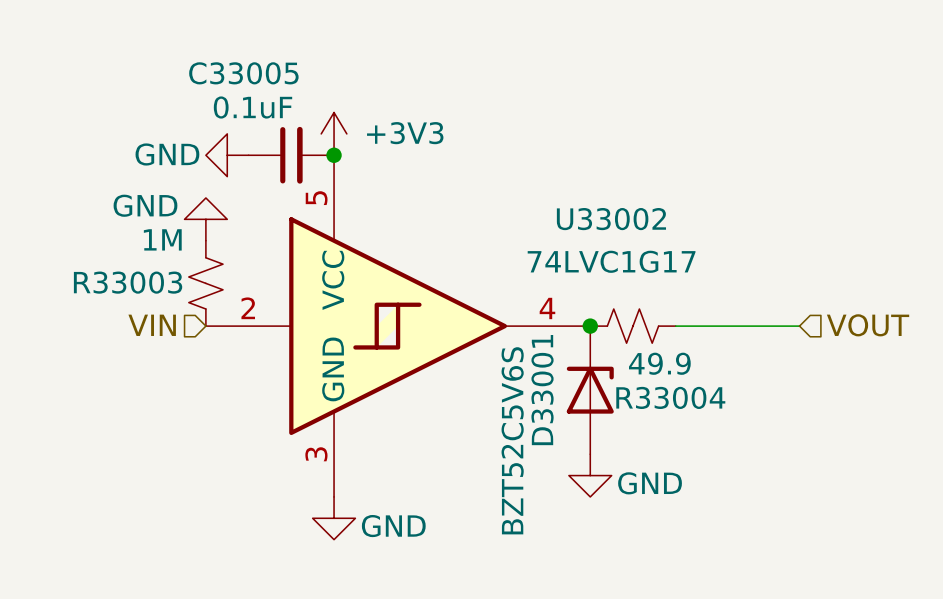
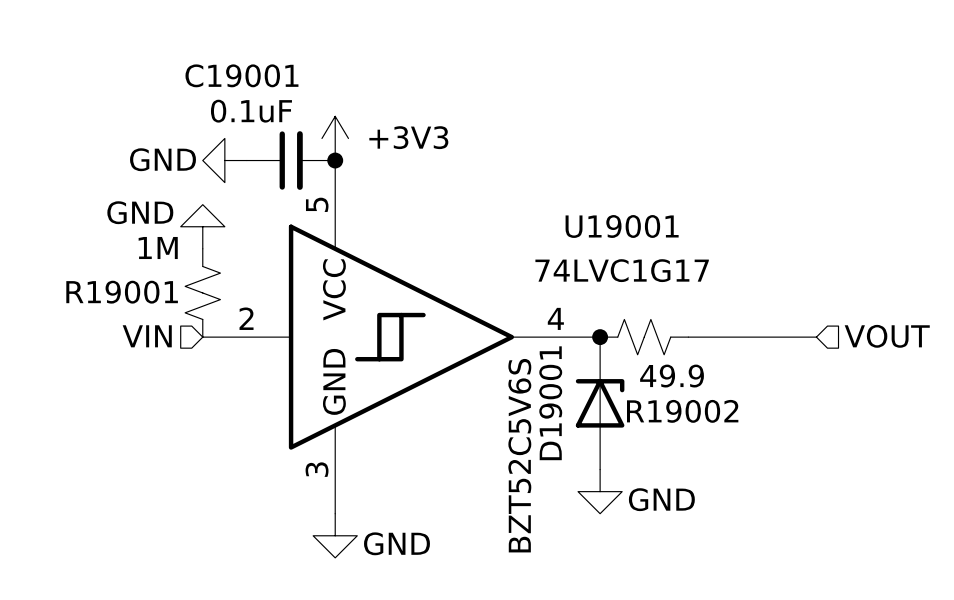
C33005 name: C33005 (243, 73) -> C19001 (241, 75)
U33002 name: U33002 (611, 219) -> U19001 (622, 226)
R33003 name: R33003 (128, 282) -> R19001 (122, 292)
D33001 name: D33001 (542, 390) -> D19001 (550, 403)
R33004 name: R33004 (670, 397) -> R19002 (682, 411)

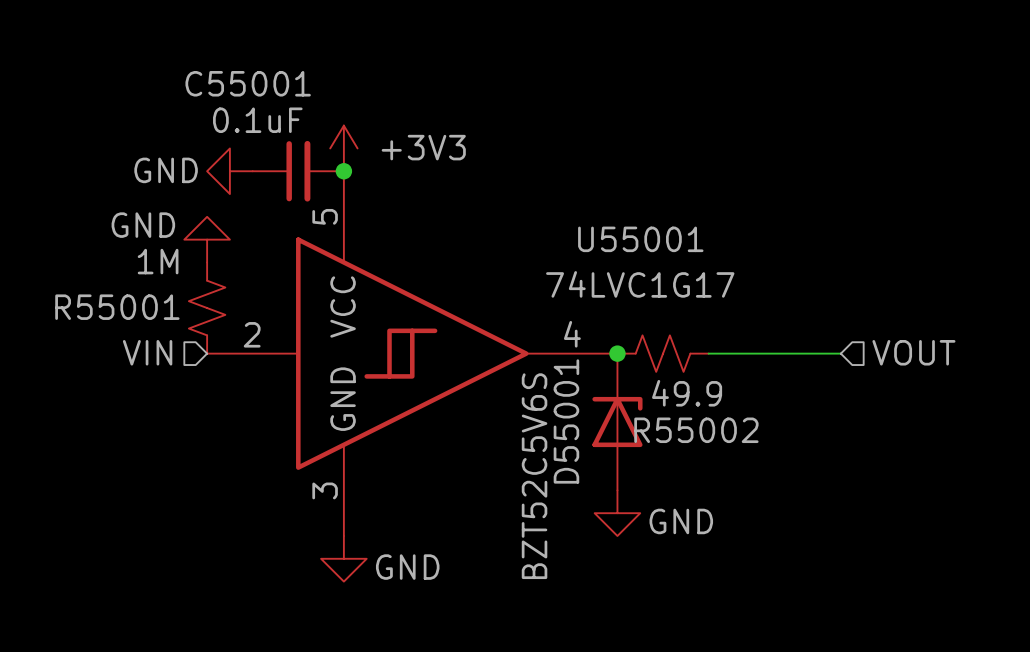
C19001 name: C19001 (241, 75) -> C55001 (248, 83)
U19001 name: U19001 (622, 226) -> U55001 (640, 239)
R19001 name: R19001 (122, 292) -> R55001 (117, 307)
D19001 name: D19001 (550, 403) -> D55001 (566, 421)
R19002 name: R19002 (682, 411) -> R55002 (696, 430)

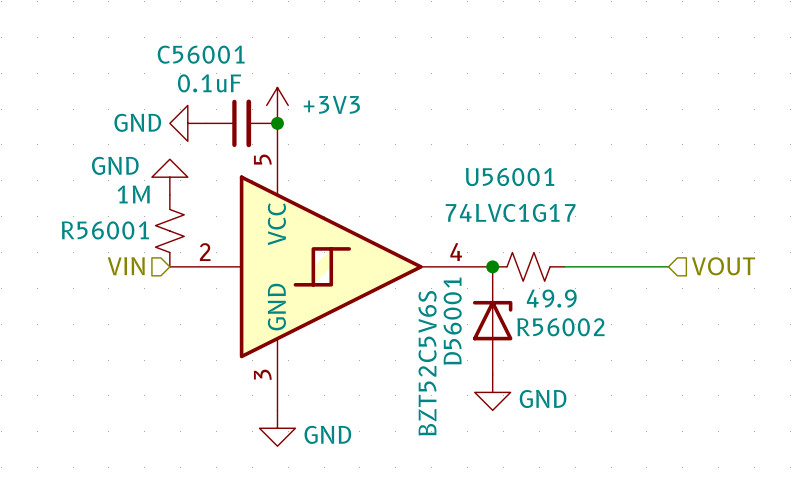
C55001 name: C55001 (248, 83) -> C56001 (201, 54)
U55001 name: U55001 (640, 239) -> U56001 (510, 177)
R55001 name: R55001 (117, 307) -> R56001 (105, 230)
D55001 name: D55001 (566, 421) -> D56001 (452, 321)
R55002 name: R55002 (696, 430) -> R56002 (560, 327)

